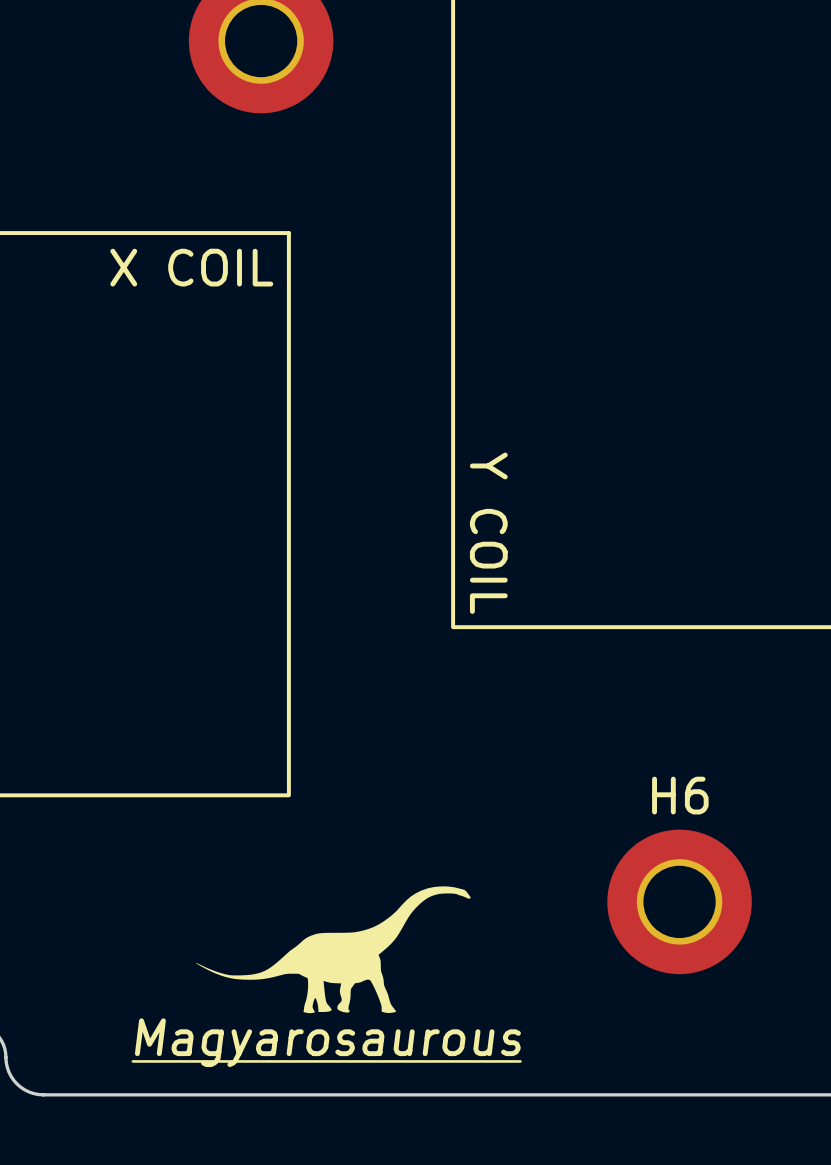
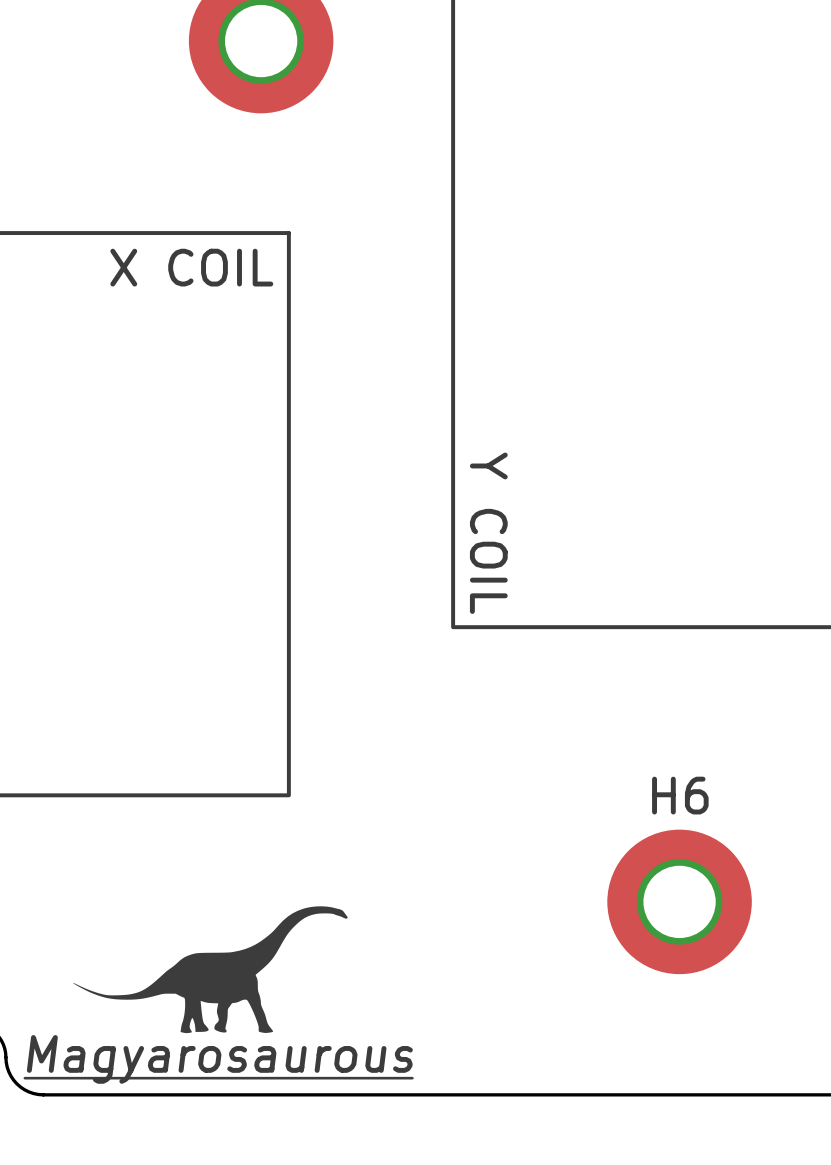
drawing position: (333, 949) -> (210, 969)
text position: Magyarosaurous (327, 1042) -> Magyarosaurous (219, 1059)
line: (132, 1061) (520, 1061) -> (24, 1078) (412, 1078)

